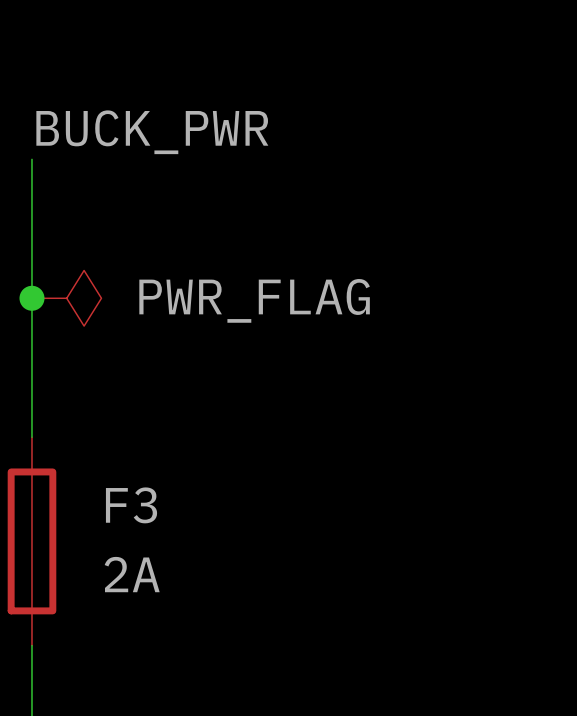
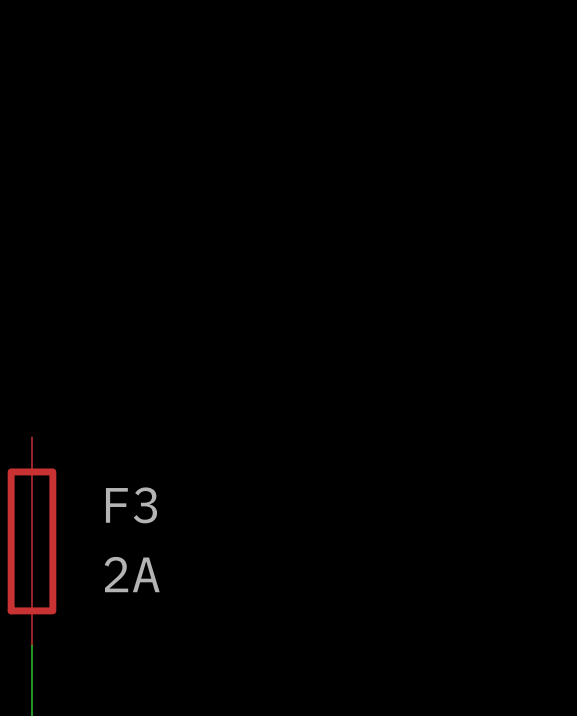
label: BUCK_PWR (152, 132) -> none
wire: (31, 159) (31, 437) -> none
junction: (31, 298) -> none
power symbol: PWR_FLAG (66, 298) -> none

